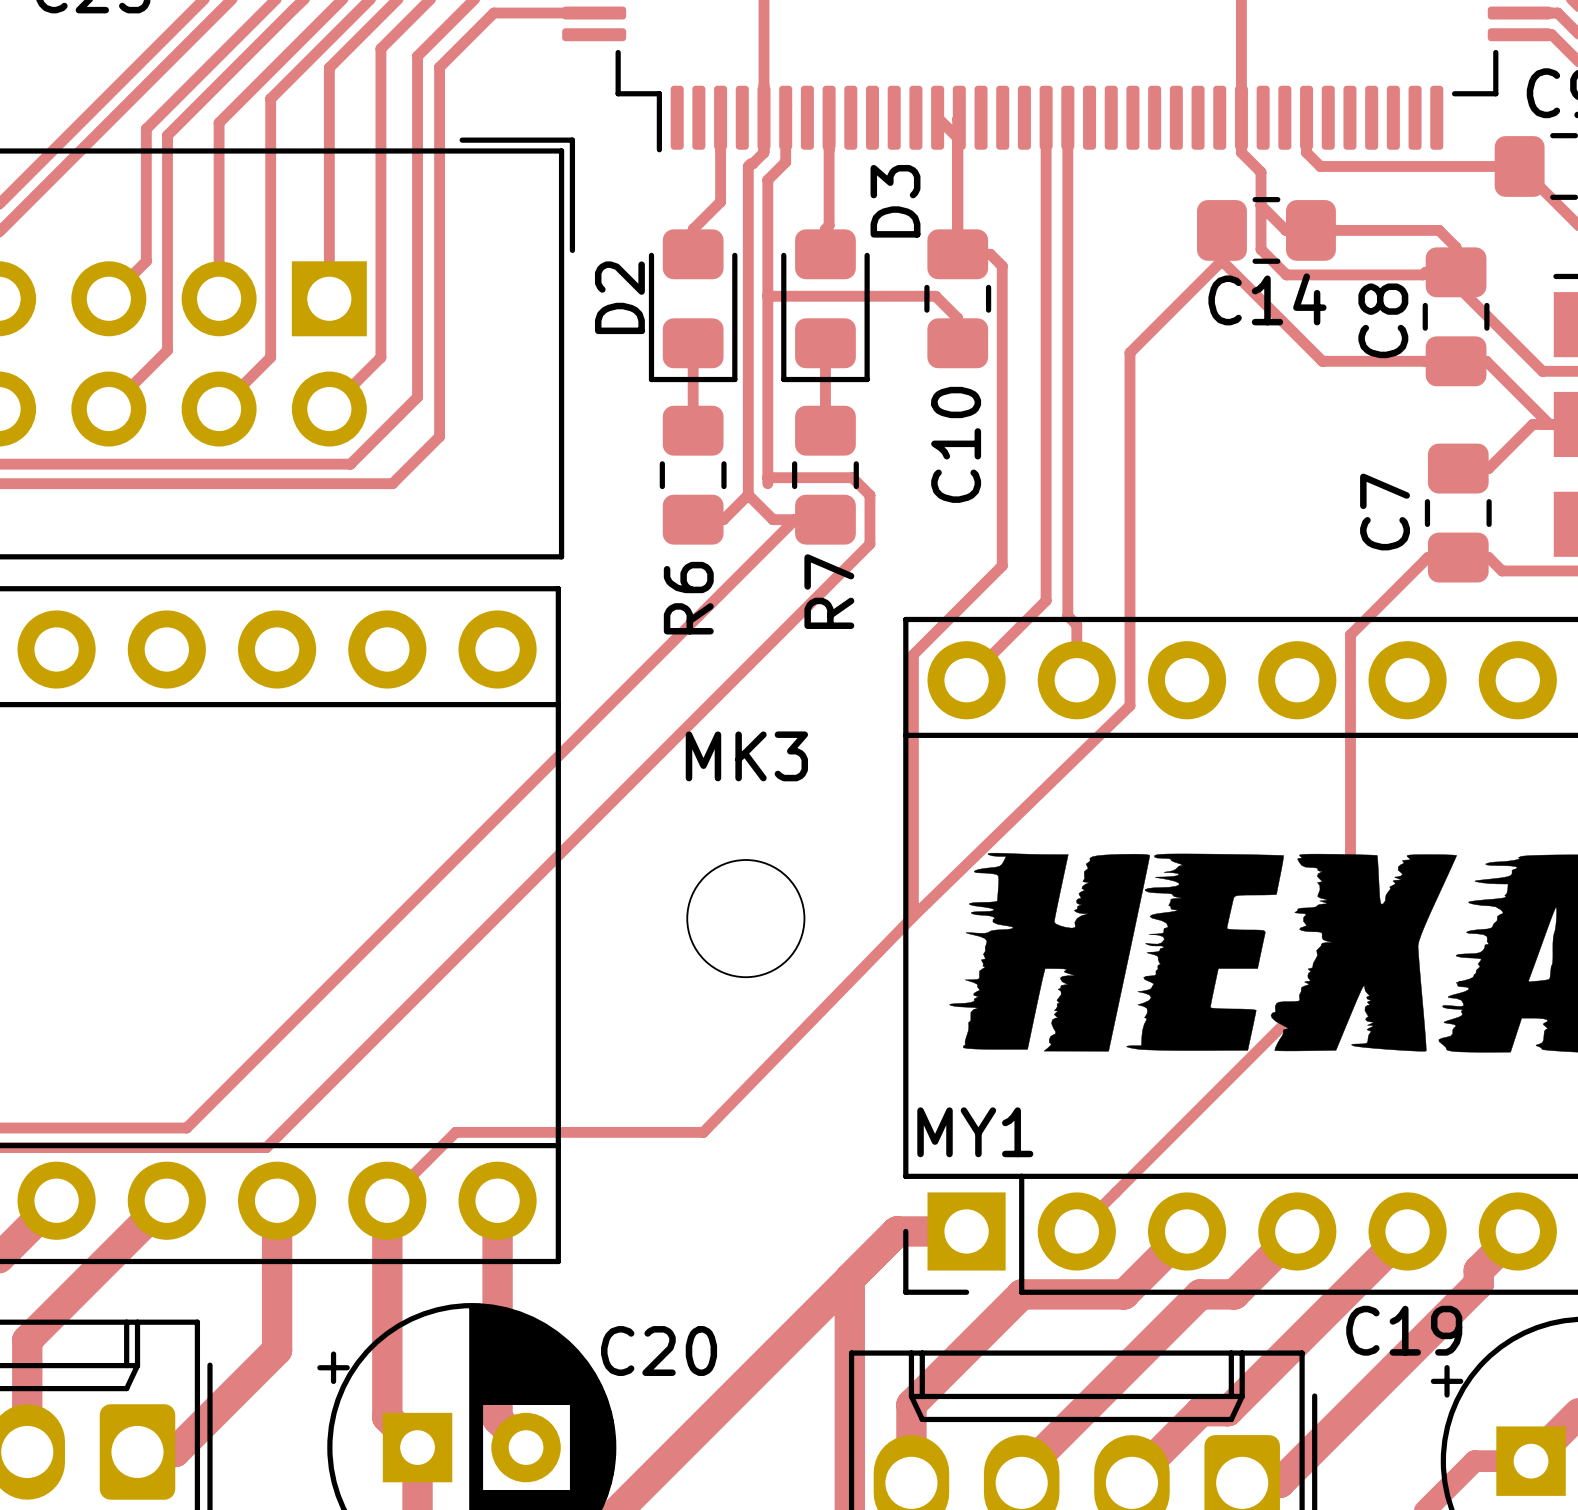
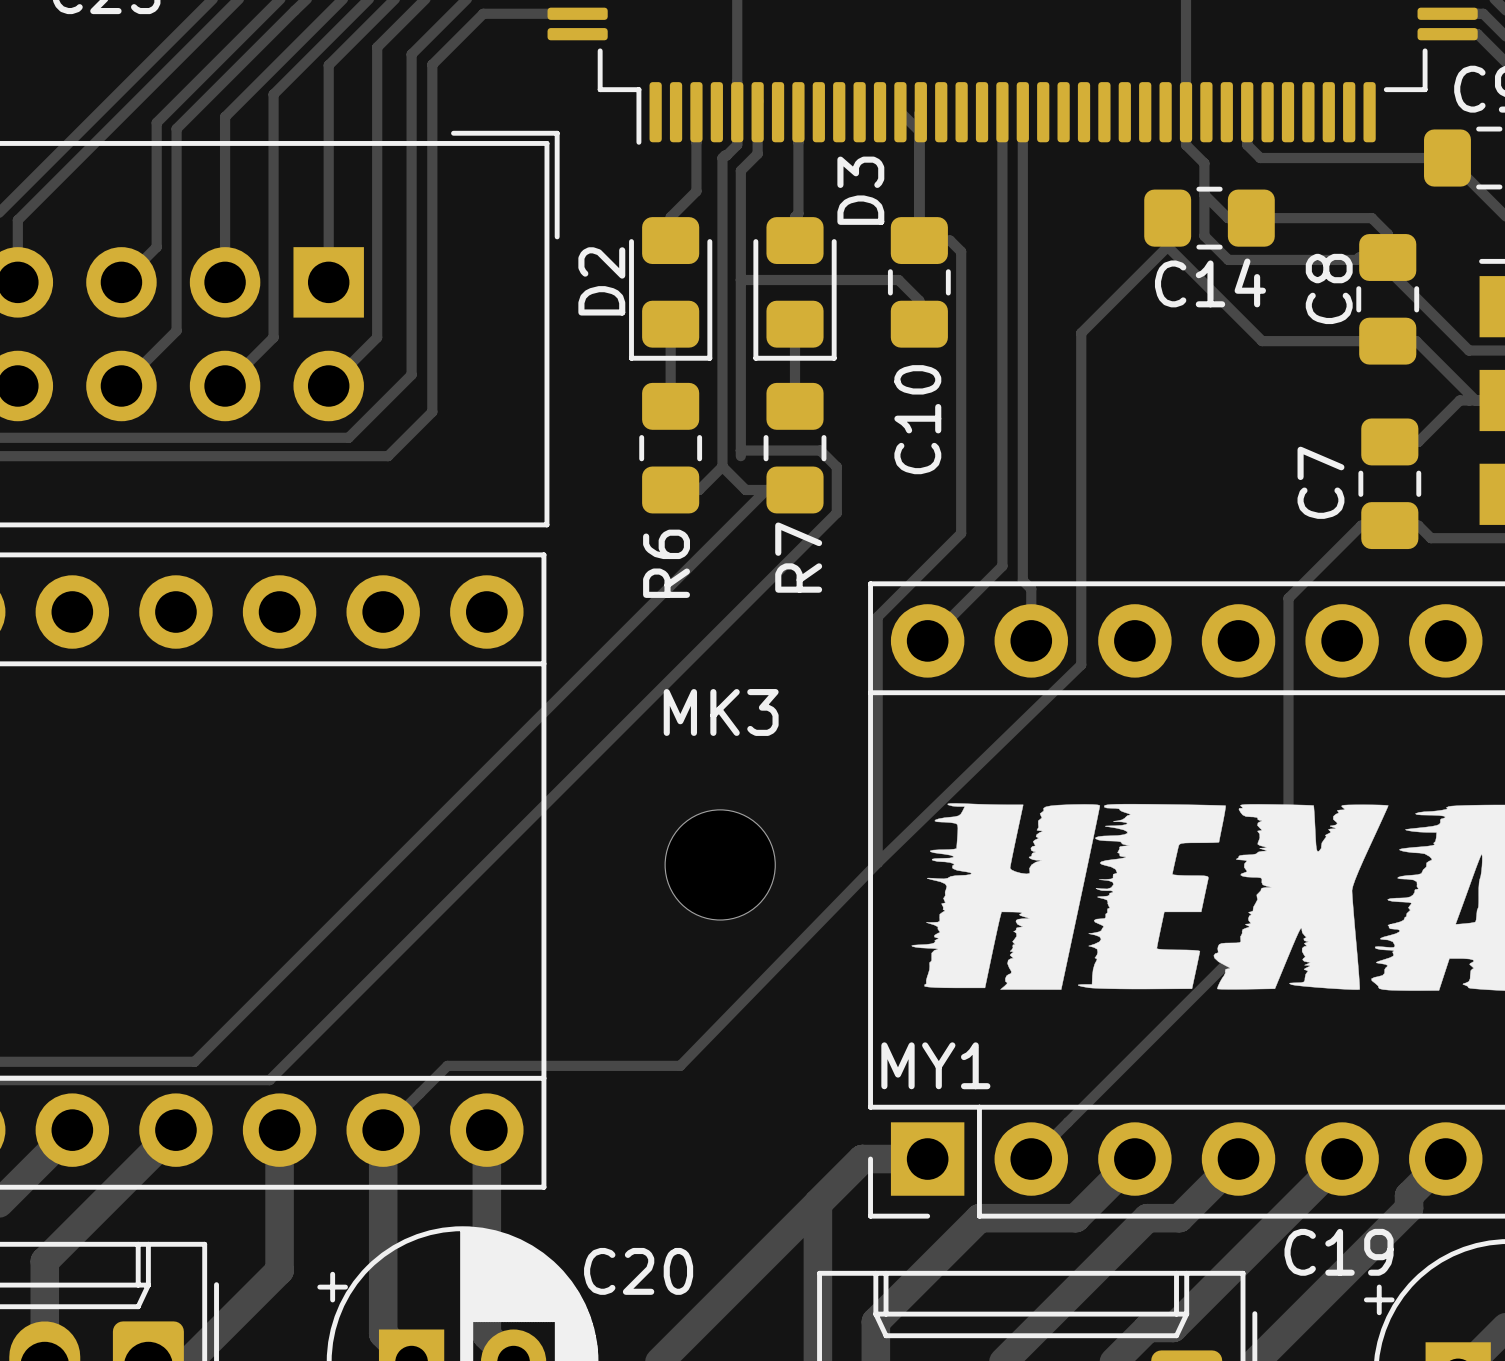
C8 name position: C8 (1383, 320) -> C8 (1329, 288)

